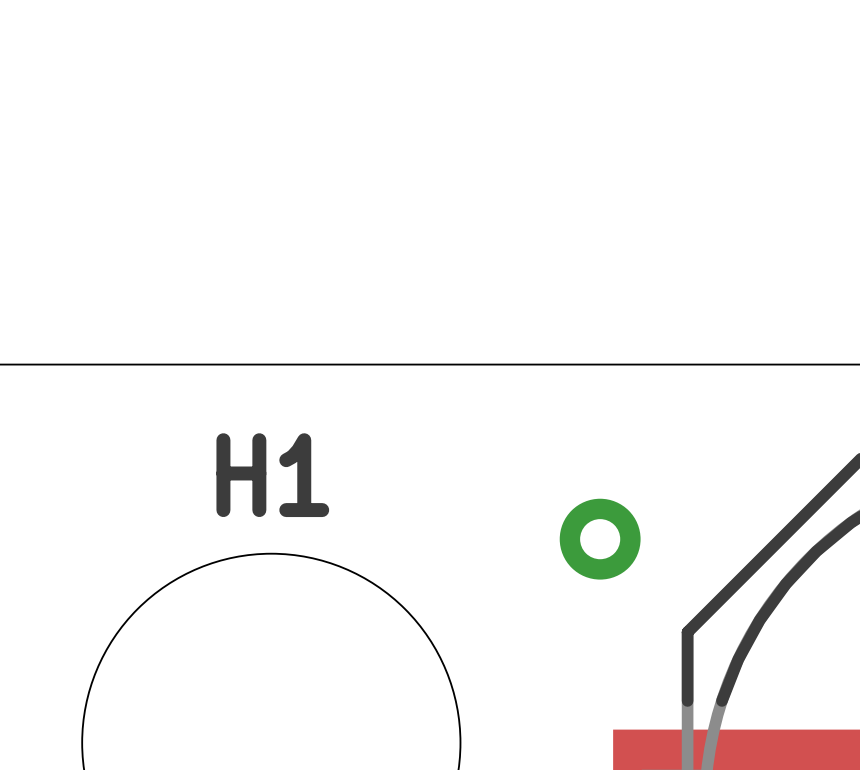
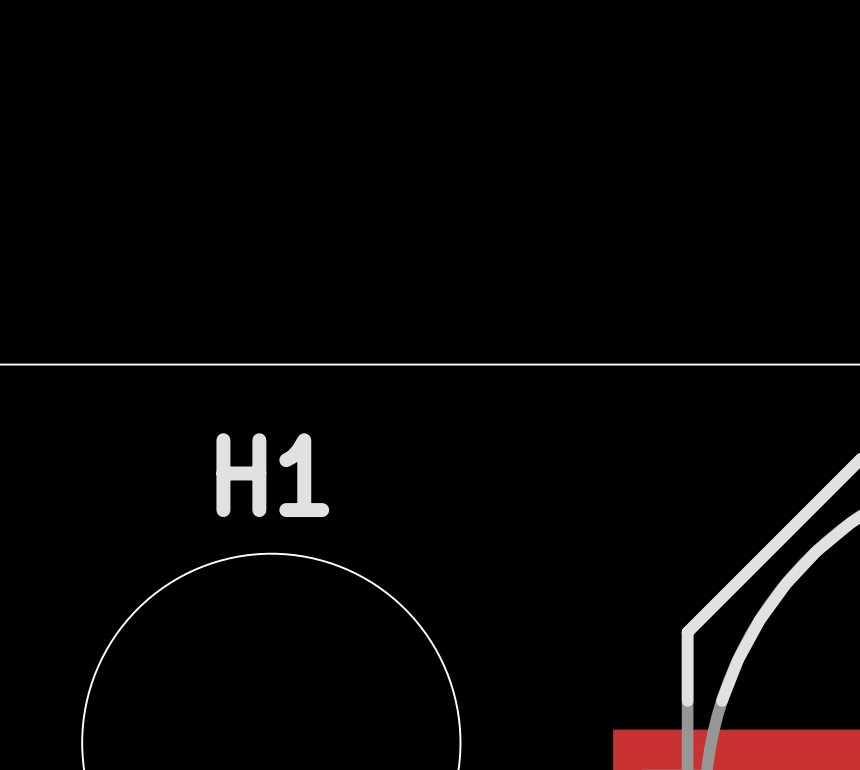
via: (600, 539) -> none

